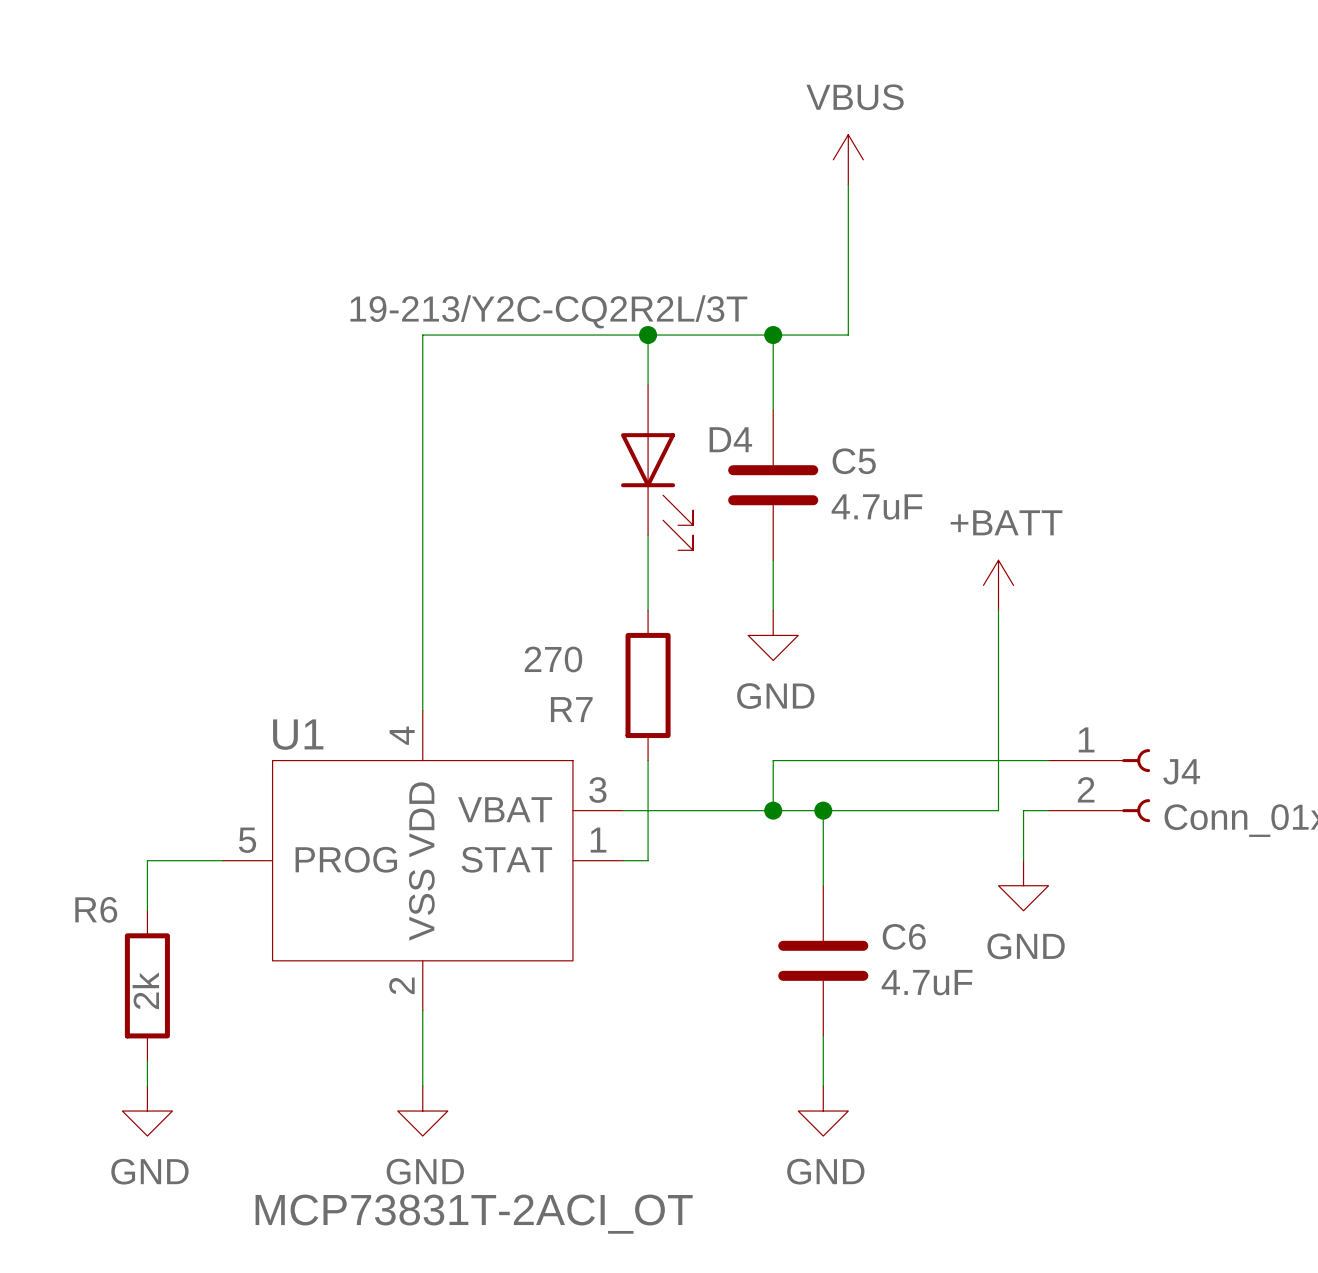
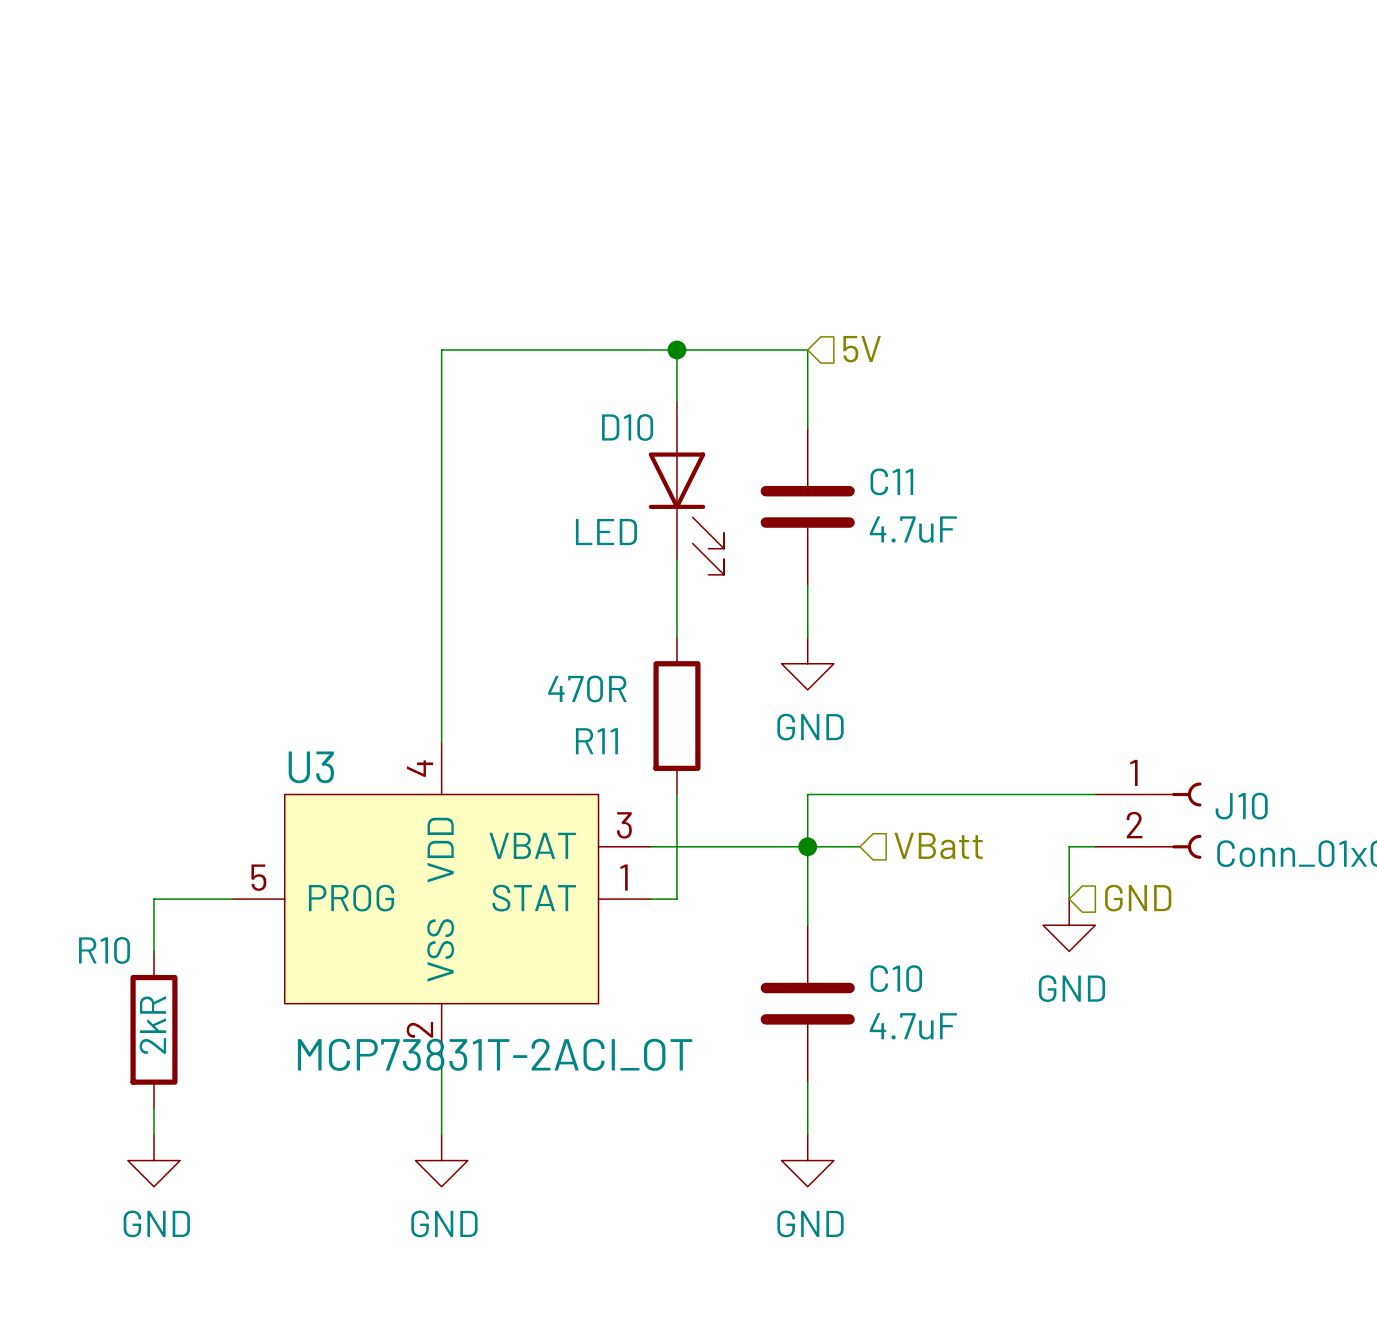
power symbol: VBUS (848, 159) -> none
wire: (848, 184) (848, 335) (773, 335) -> none
D4 value: 19-213/Y2C-CQ2R2L/3T (548, 311) -> LED (606, 532)
hierarchical label: none -> 5V (862, 349)
junction: (773, 335) -> none
D4 name: D4 (730, 439) -> D10 (627, 427)
C5 name: C5 (854, 461) -> C11 (891, 481)
power symbol: +BATT (998, 585) -> none
wire: (998, 610) (998, 810) (823, 810) (823, 885) -> none
R7 value: 270 (553, 659) -> 470R (587, 688)
R7 name: R7 (571, 709) -> R11 (596, 741)
U1 name: U1 (298, 734) -> U3 (311, 767)
J4 name: J4 (1181, 771) -> J10 (1241, 806)
hierarchical label: none -> VBatt (938, 845)
wire: none -> (807, 846) (807, 925)
junction: (823, 810) -> none
hierarchical label: none -> GND (1138, 898)
R6 name: R6 (96, 909) -> R10 (104, 950)
C10: none -> 4.7uF (807, 1003)
C6: 4.7uF (823, 960) -> none
R6 value: 2k (145, 990) -> 2kR (152, 1025)
wire: (823, 1035) (823, 1085) -> (807, 1082) (807, 1134)
power symbol position: GND (823, 1111) -> GND (807, 1160)
U1 value position: MCP73831T-2ACI_OT (474, 1214) -> MCP73831T-2ACI_OT (495, 1054)

